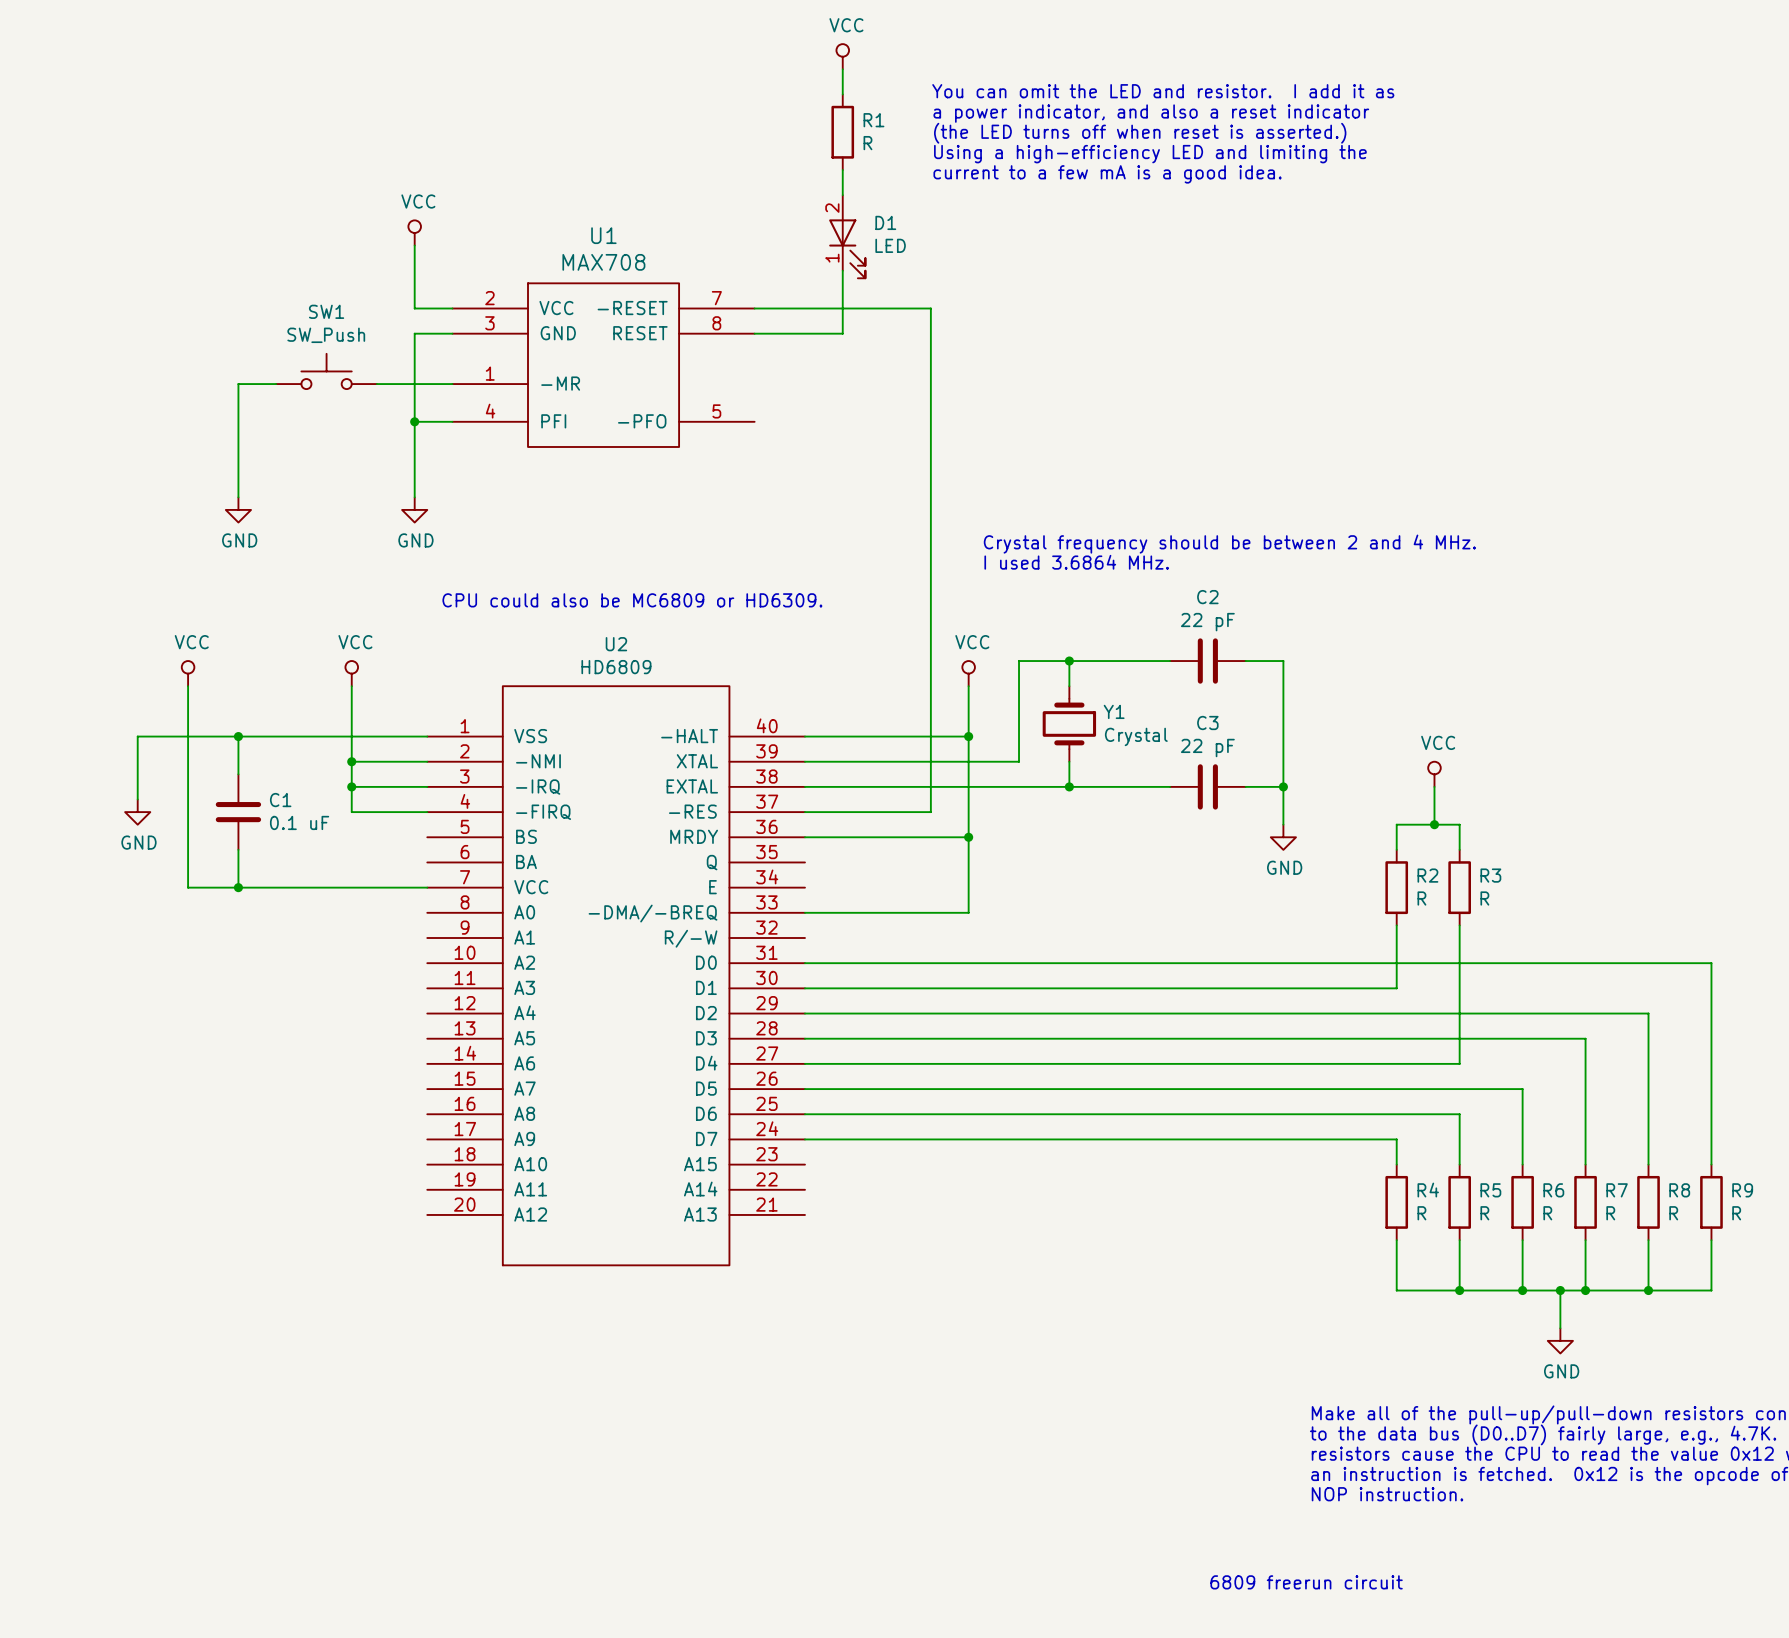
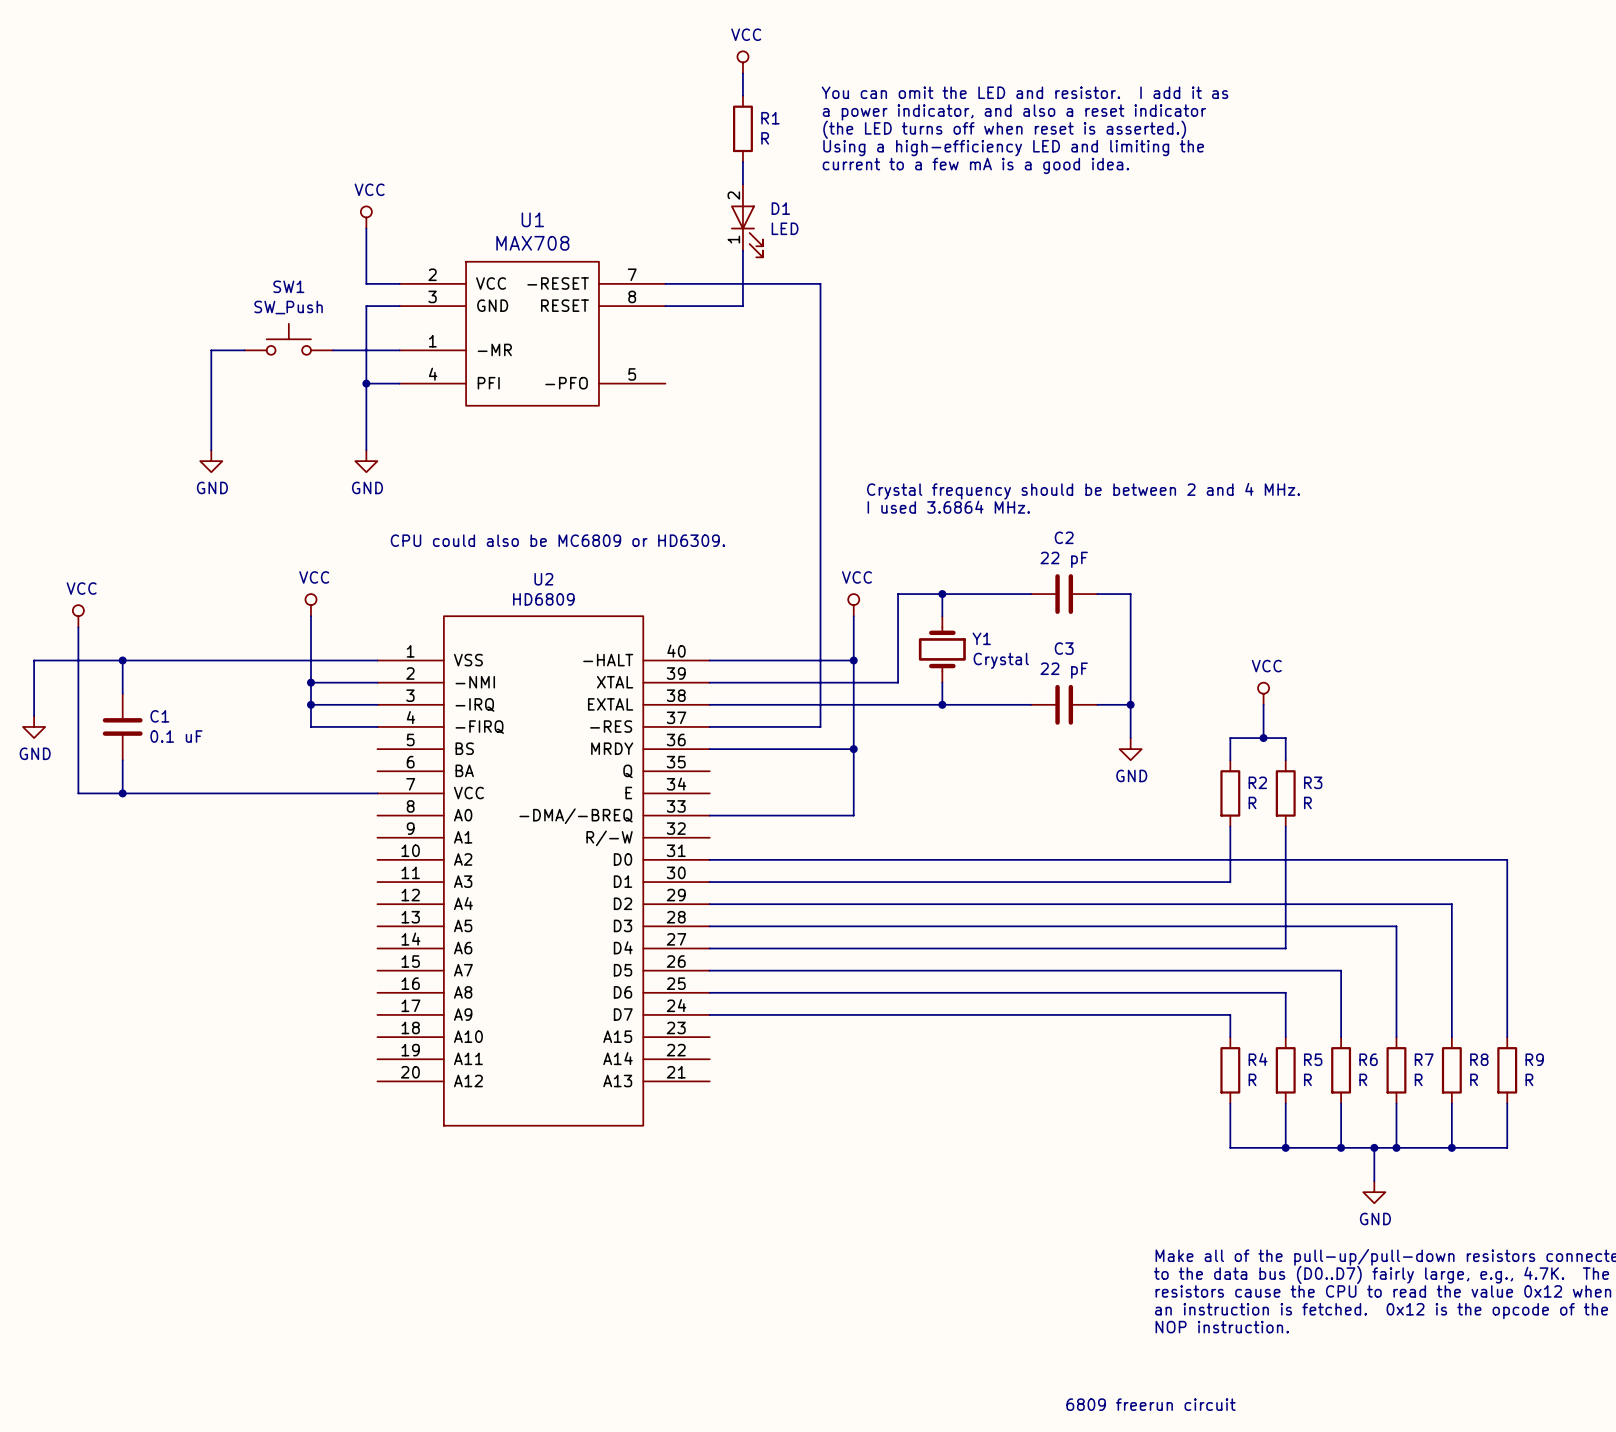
power symbol position: VCC (188, 673) -> VCC (78, 616)
wire: (188, 686) (188, 887) -> (78, 627) (78, 793) (167, 793)
wire: none -> (122, 660) (34, 660) (34, 715)
junction: none -> (122, 660)
wire: (238, 736) (238, 774) -> none
junction: (238, 736) -> none
power symbol position: GND (137, 812) -> GND (34, 726)
C1 position: (238, 812) -> (122, 726)
wire: (238, 849) (238, 887) -> (122, 760) (122, 793)
junction: none -> (122, 793)
junction: (238, 887) -> none

